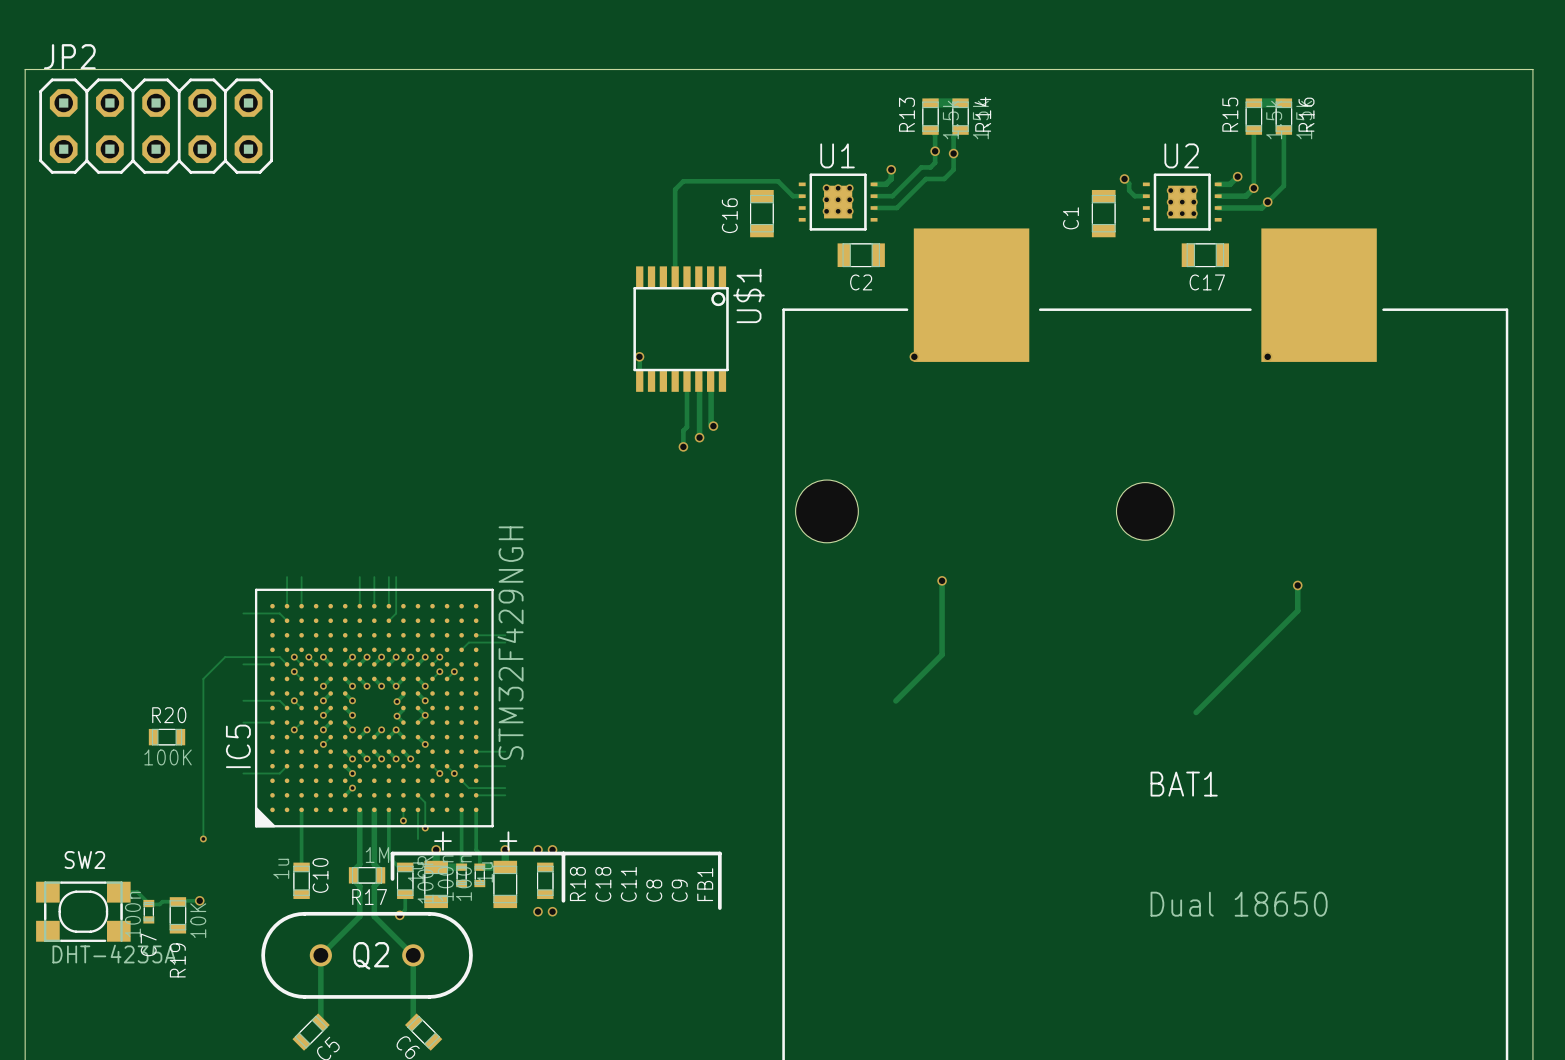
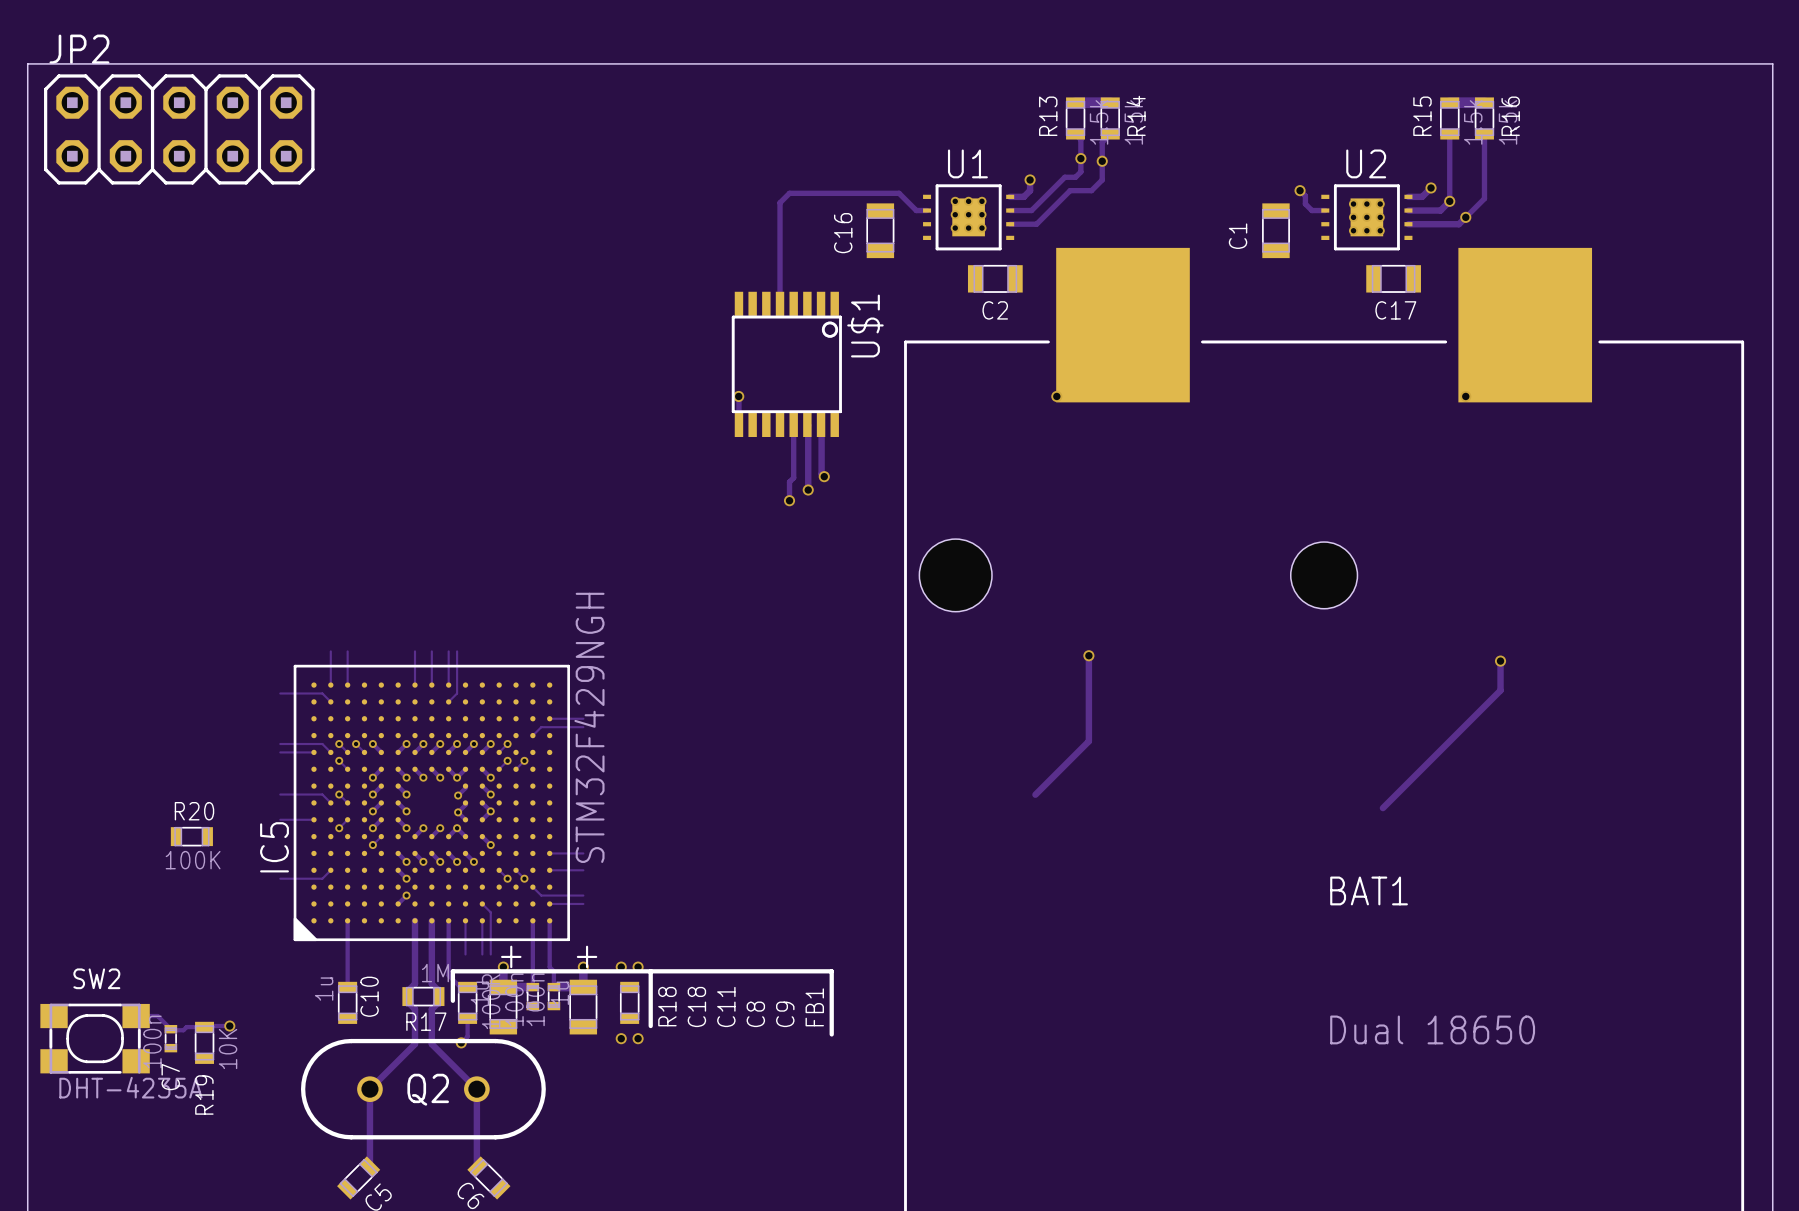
track: (243, 657) (225, 657) (203, 678) (203, 838) -> none
track: none -> (465, 929) (465, 954)
via: (403, 820) -> none
track: none -> (490, 941) (490, 954)
via: (425, 828) -> none
via: (203, 838) -> none

